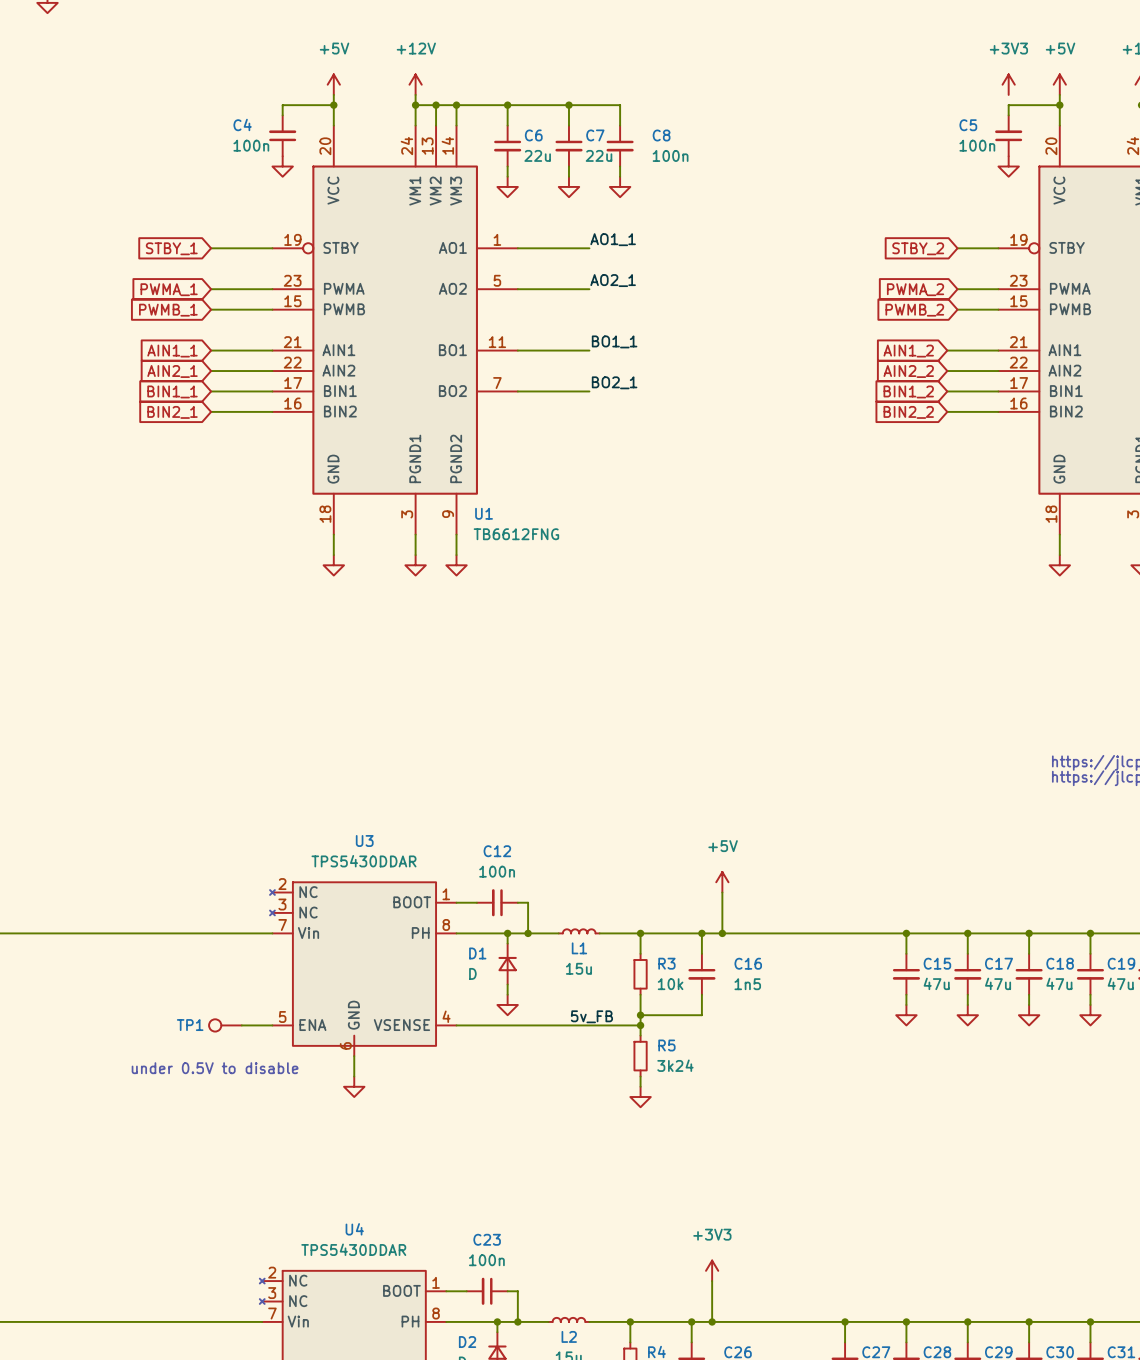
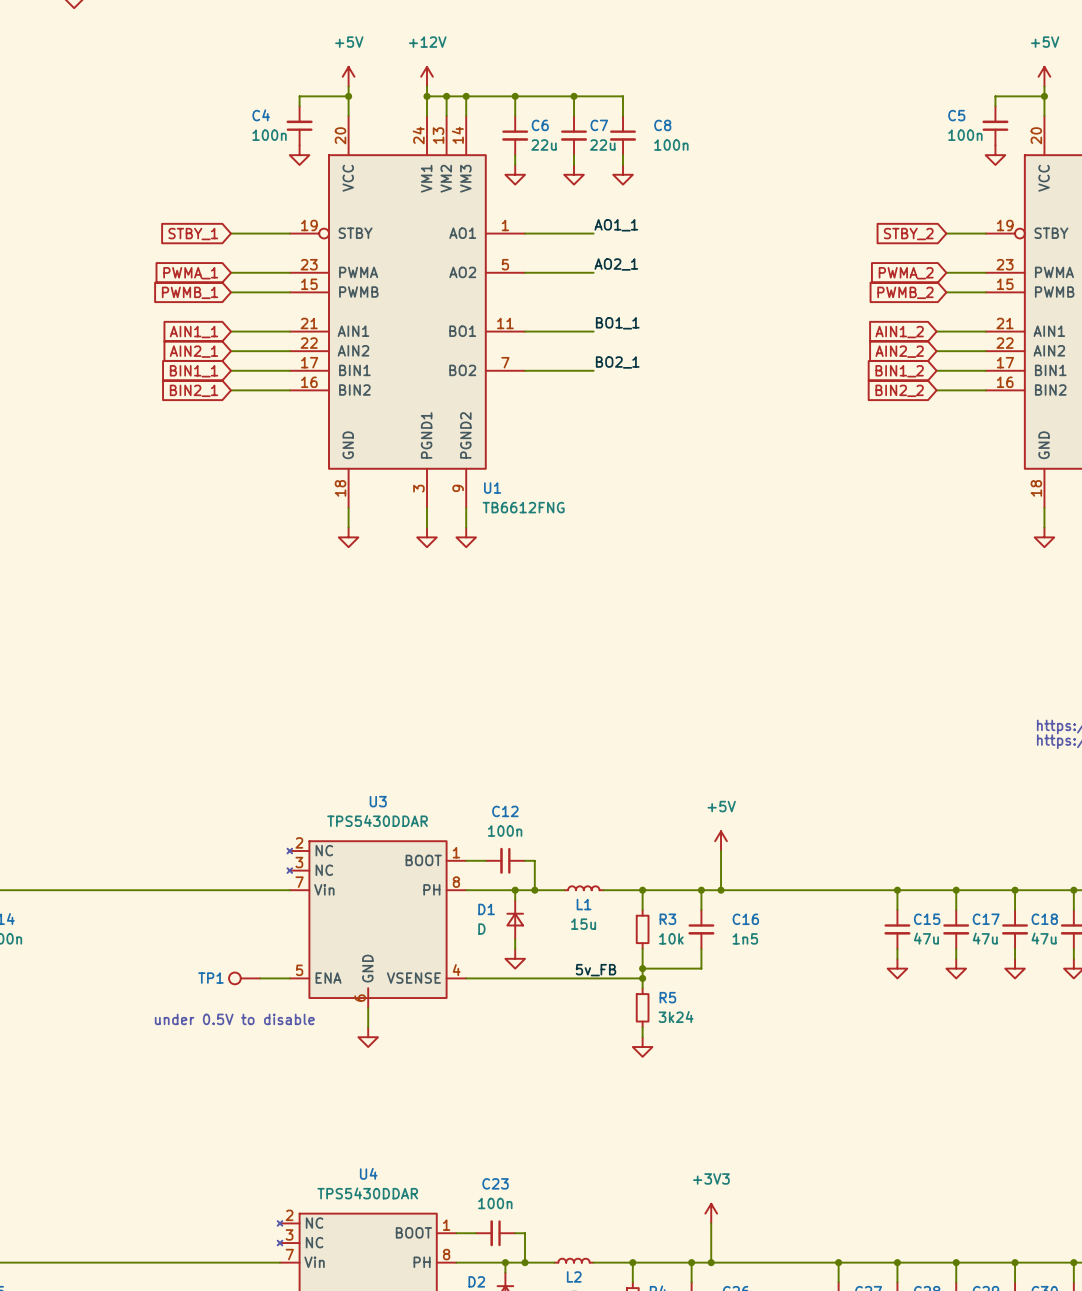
power symbol: +3V3 (1008, 84) -> none

